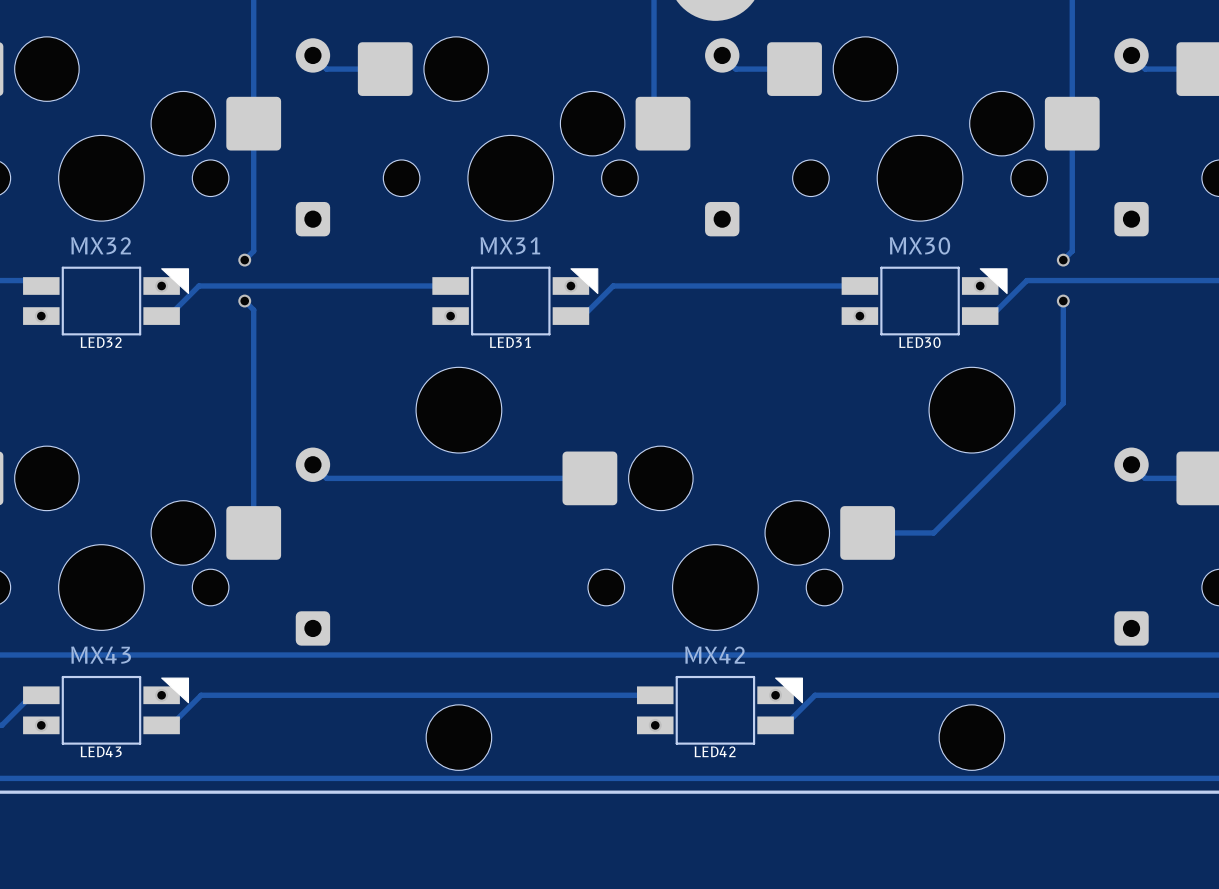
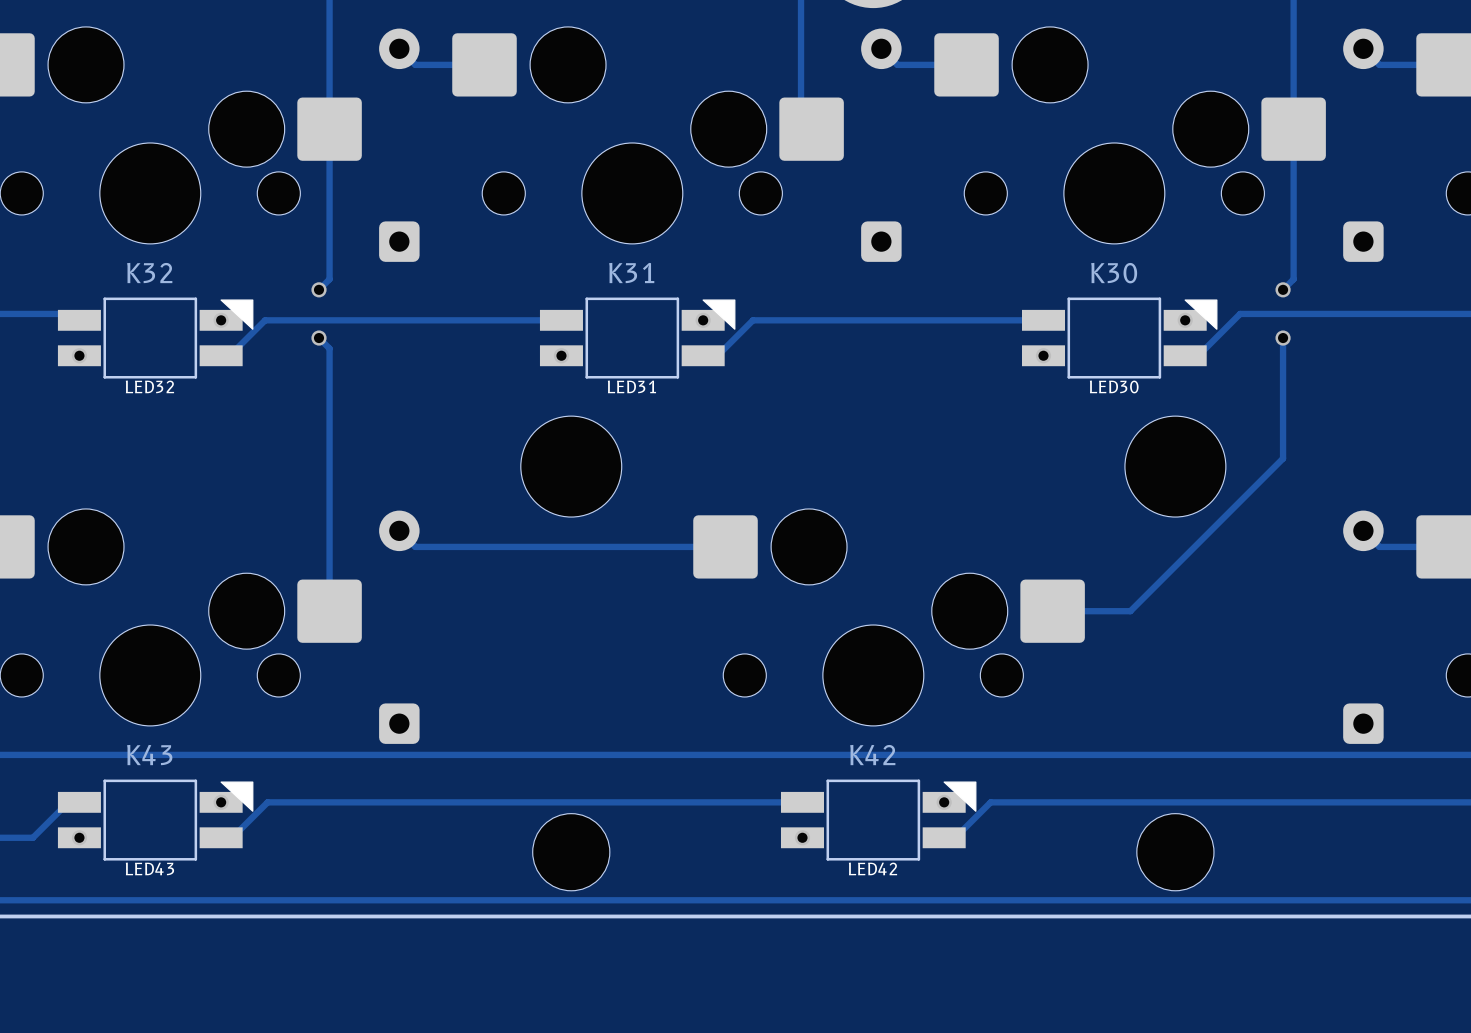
MX32 name: MX32 (101, 245) -> K32 (149, 273)
MX31 name: MX31 (510, 245) -> K31 (631, 273)
MX30 name: MX30 (919, 245) -> K30 (1114, 273)
MX43 name: MX43 (101, 655) -> K43 (149, 755)
MX42 name: MX42 (715, 655) -> K42 (872, 755)

